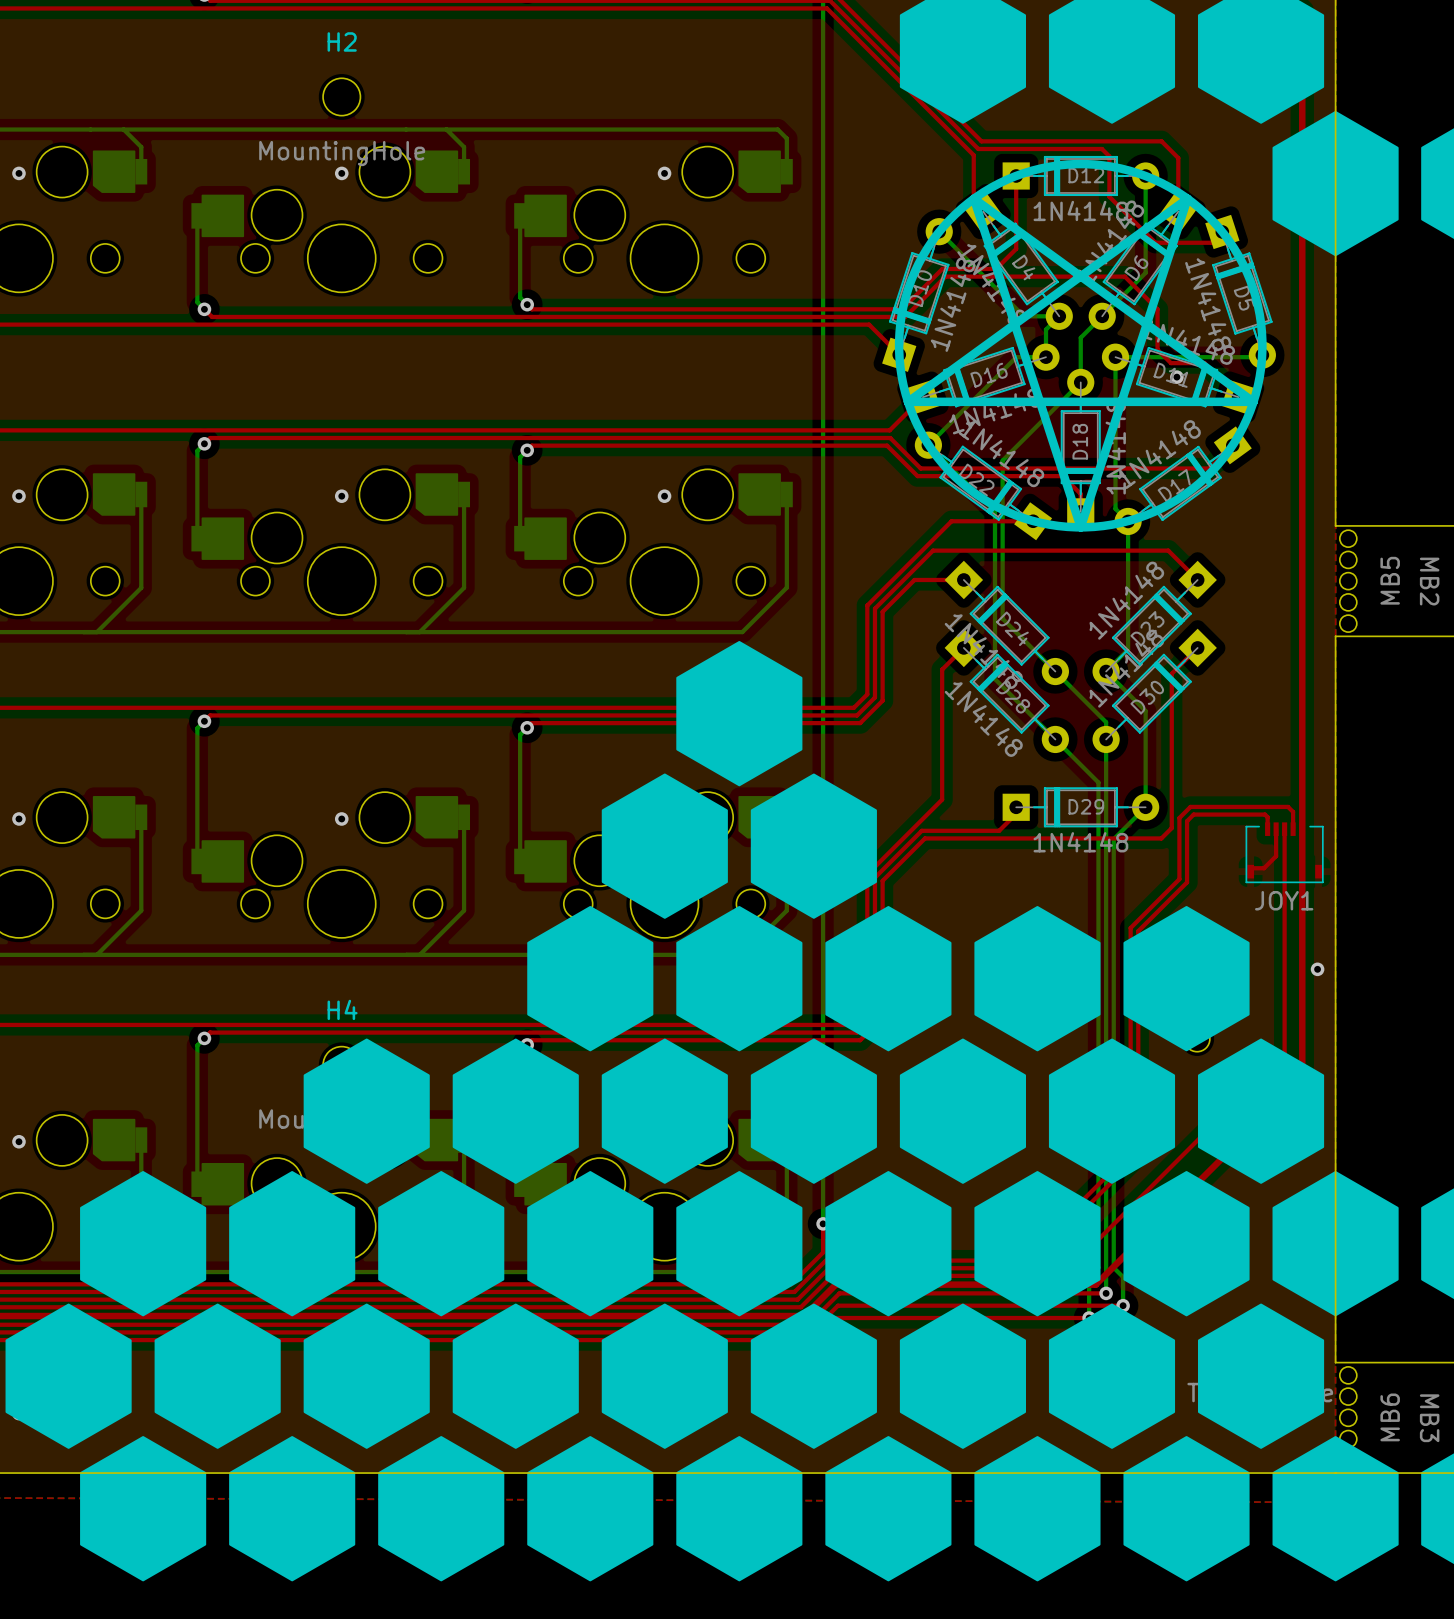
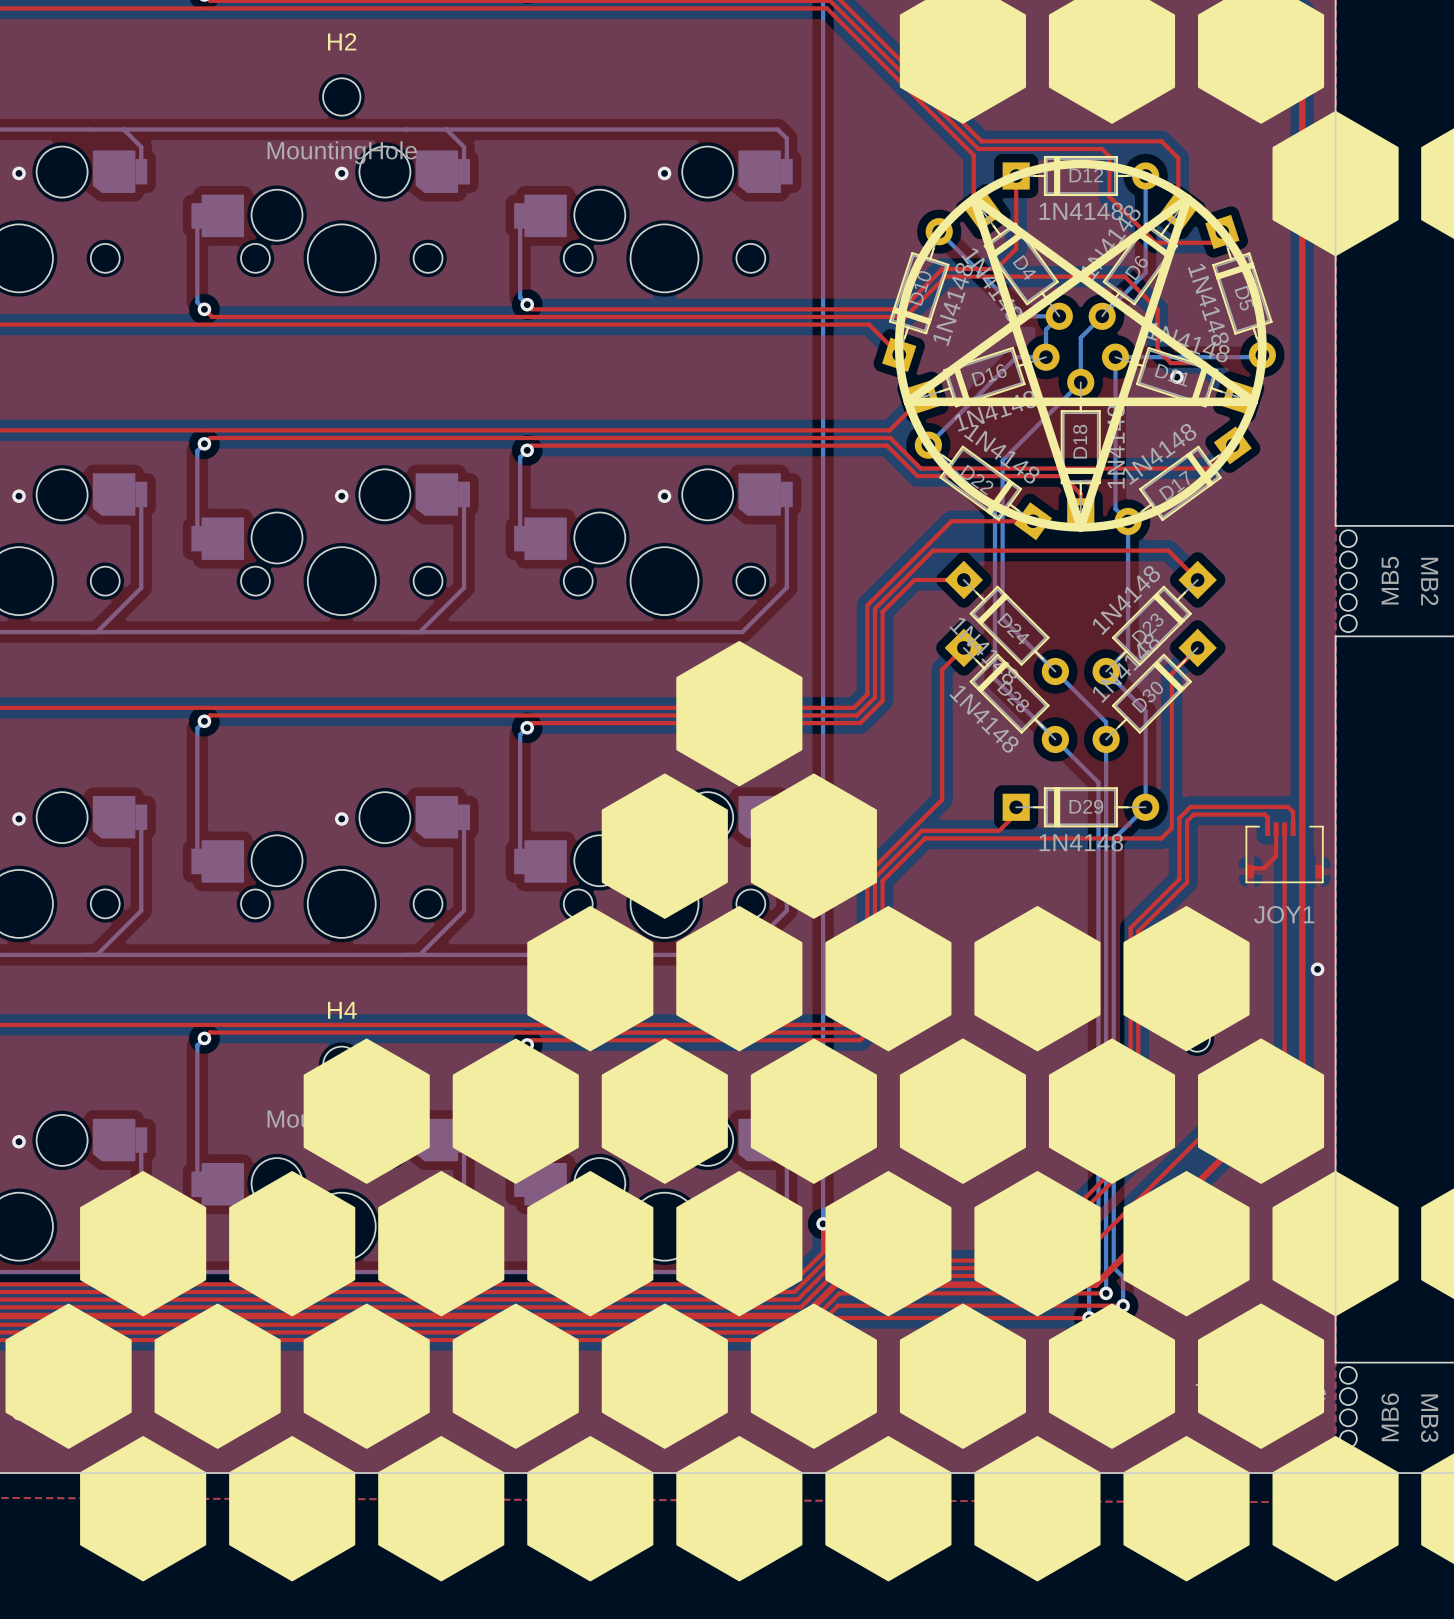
JOY1 name position: JOY1 (1284, 900) -> JOY1 (1284, 914)

